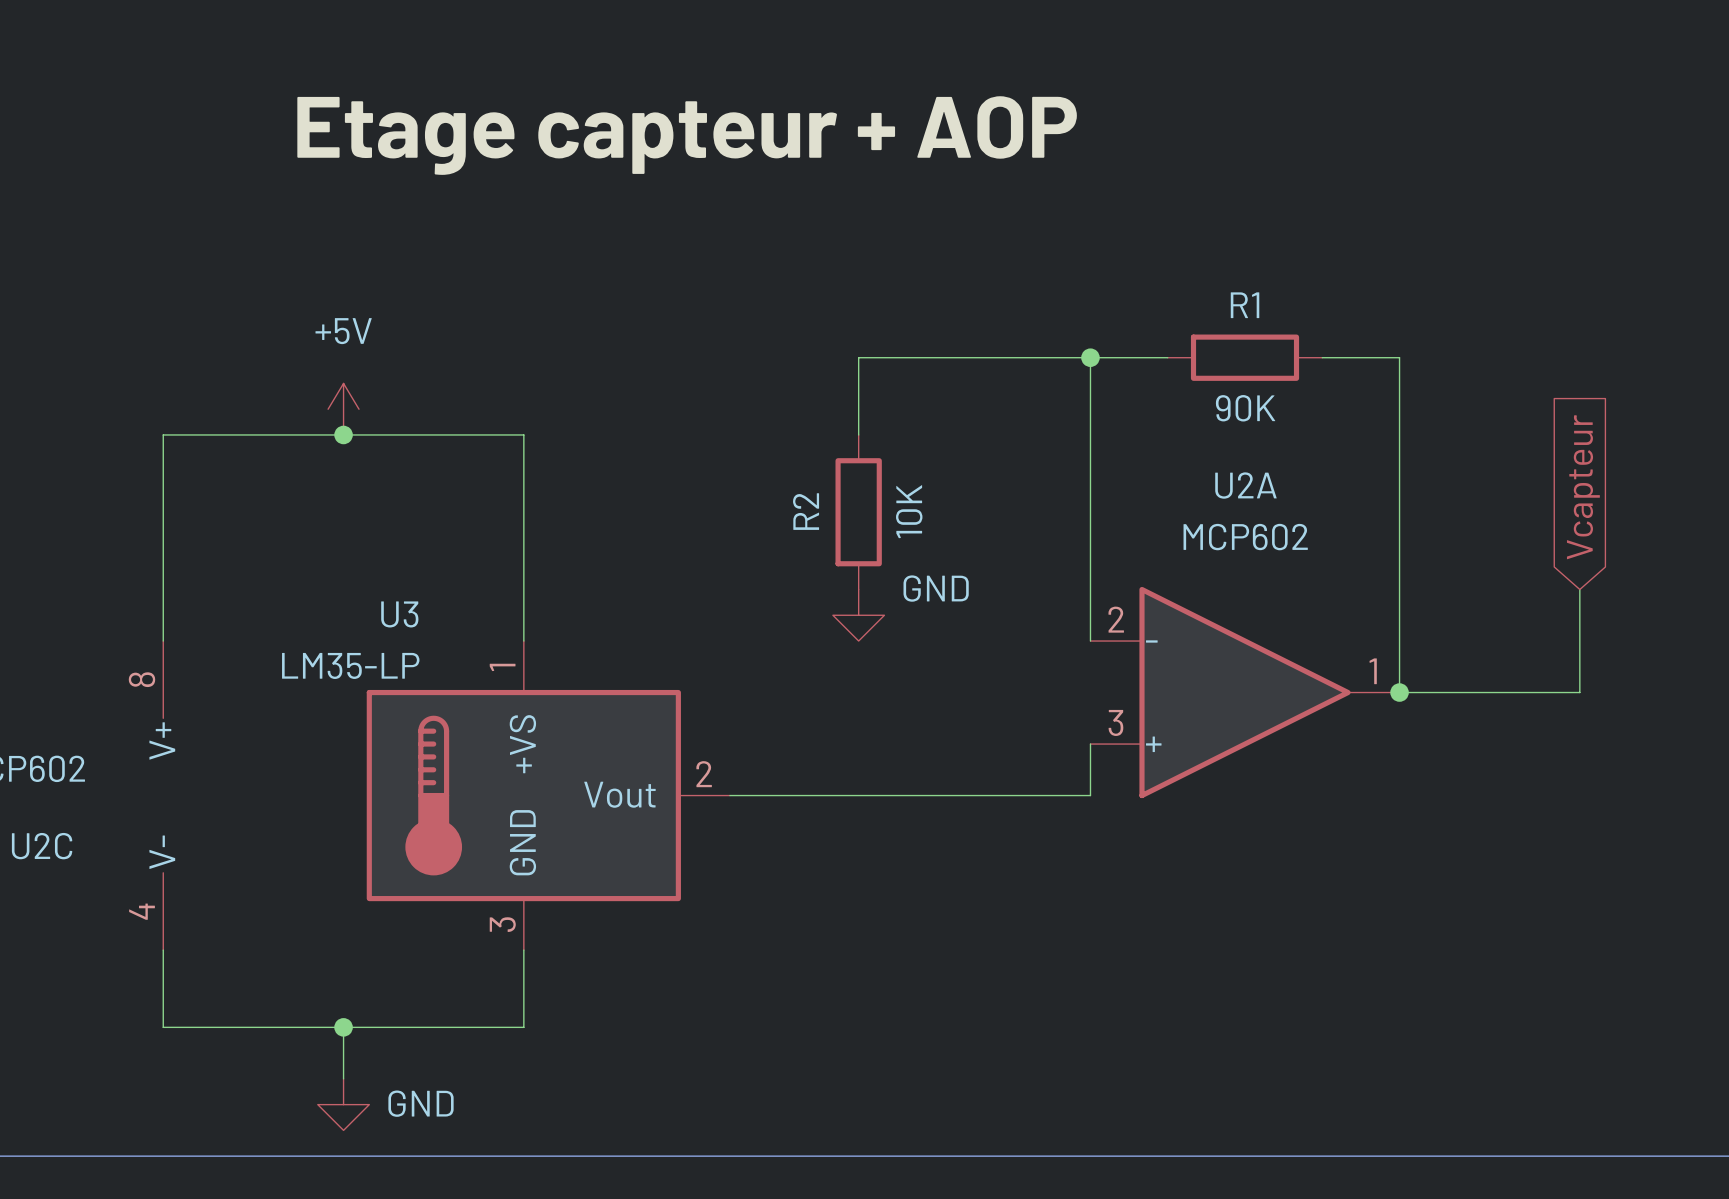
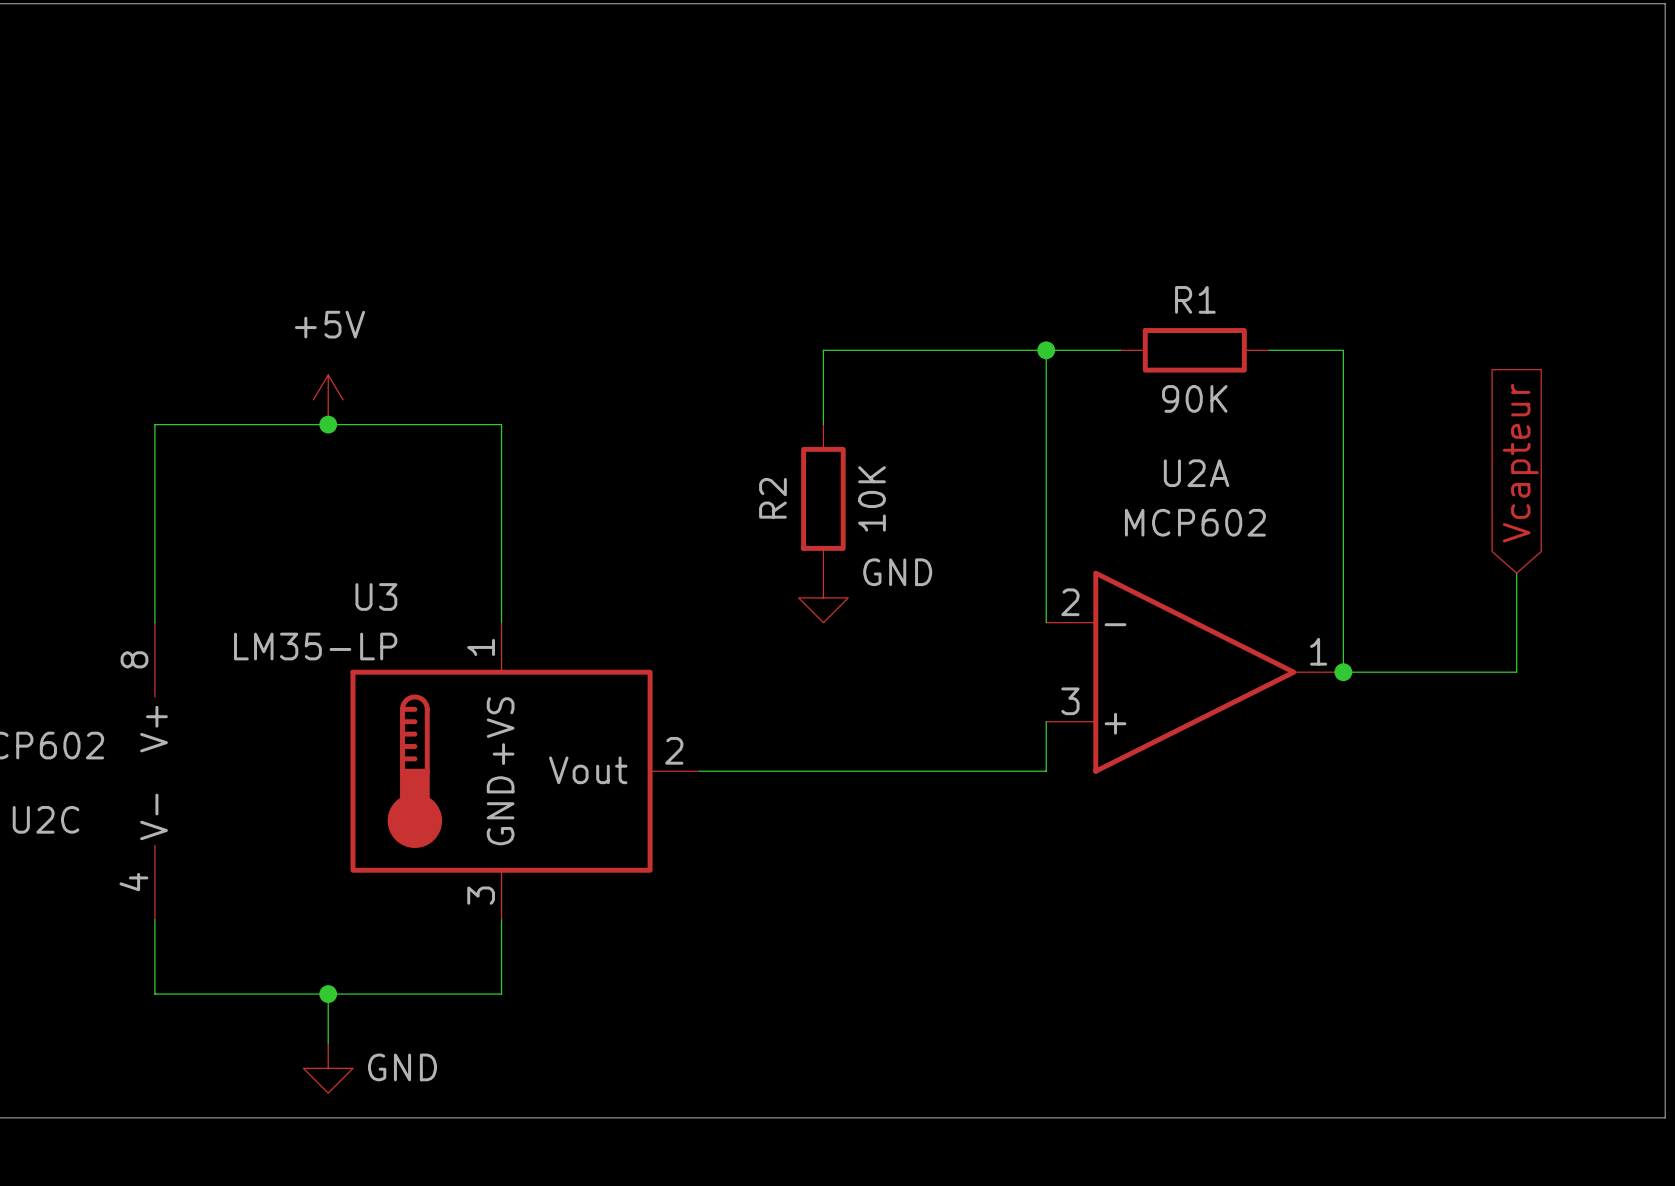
label: Etage capteur + AOP (687, 135) -> none

